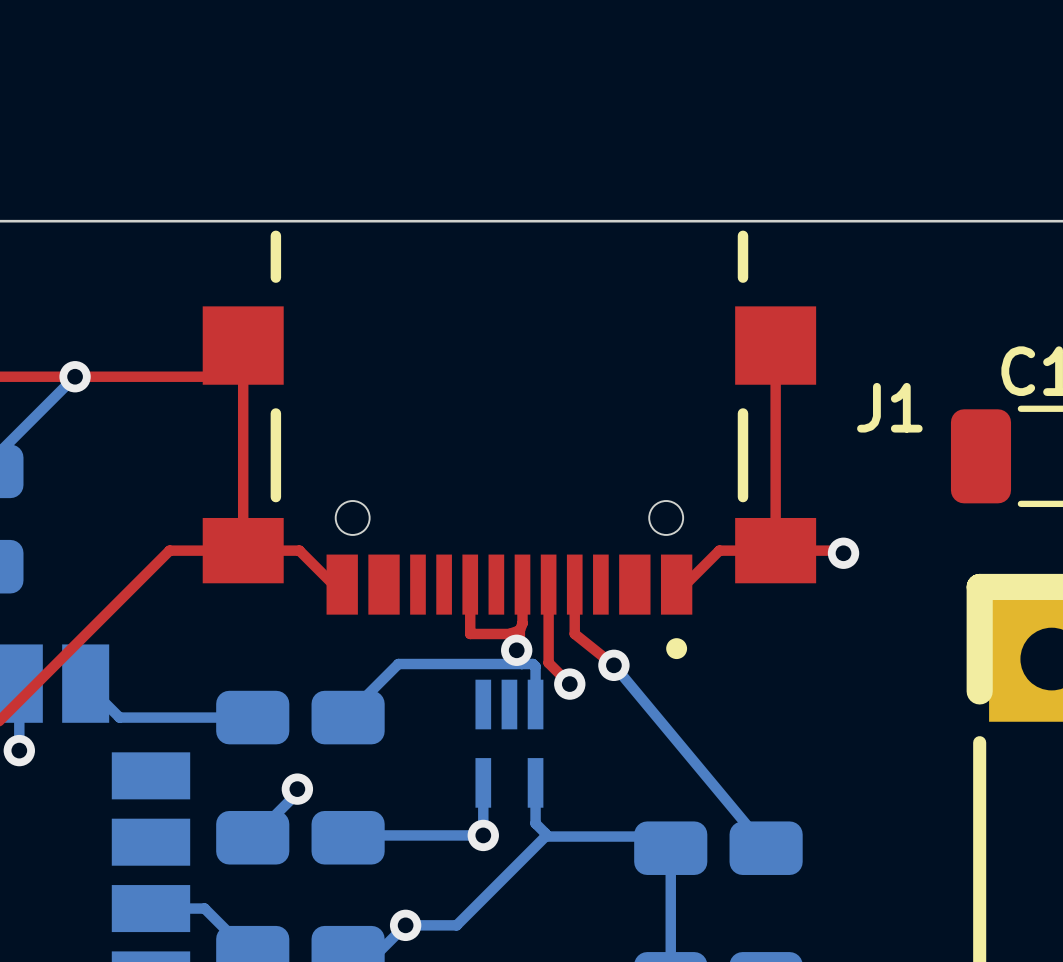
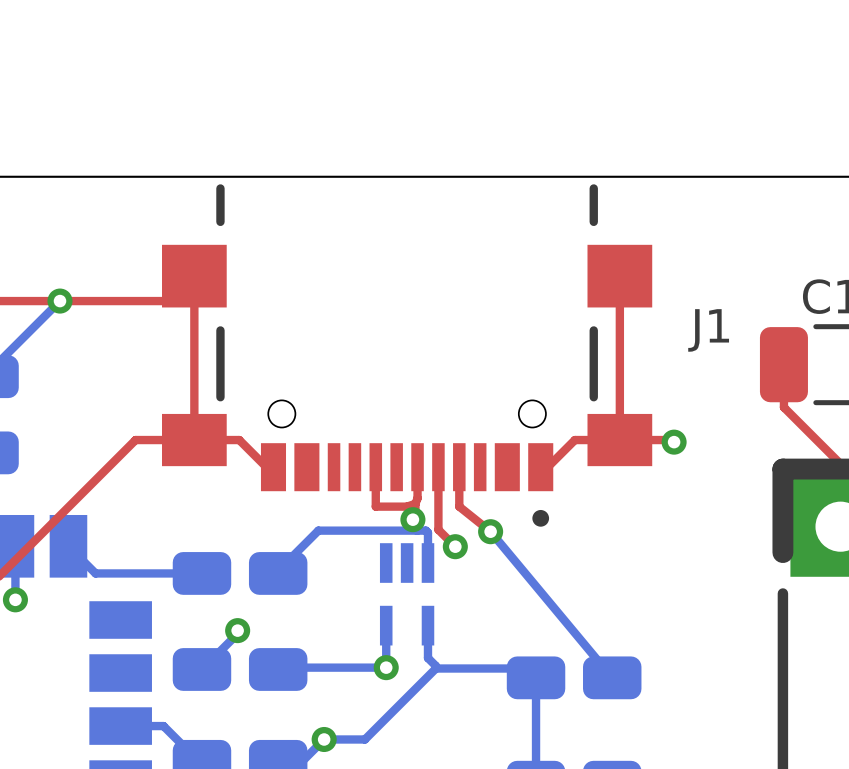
top track: none -> (783, 364) (783, 407) (840, 463) (840, 526)

